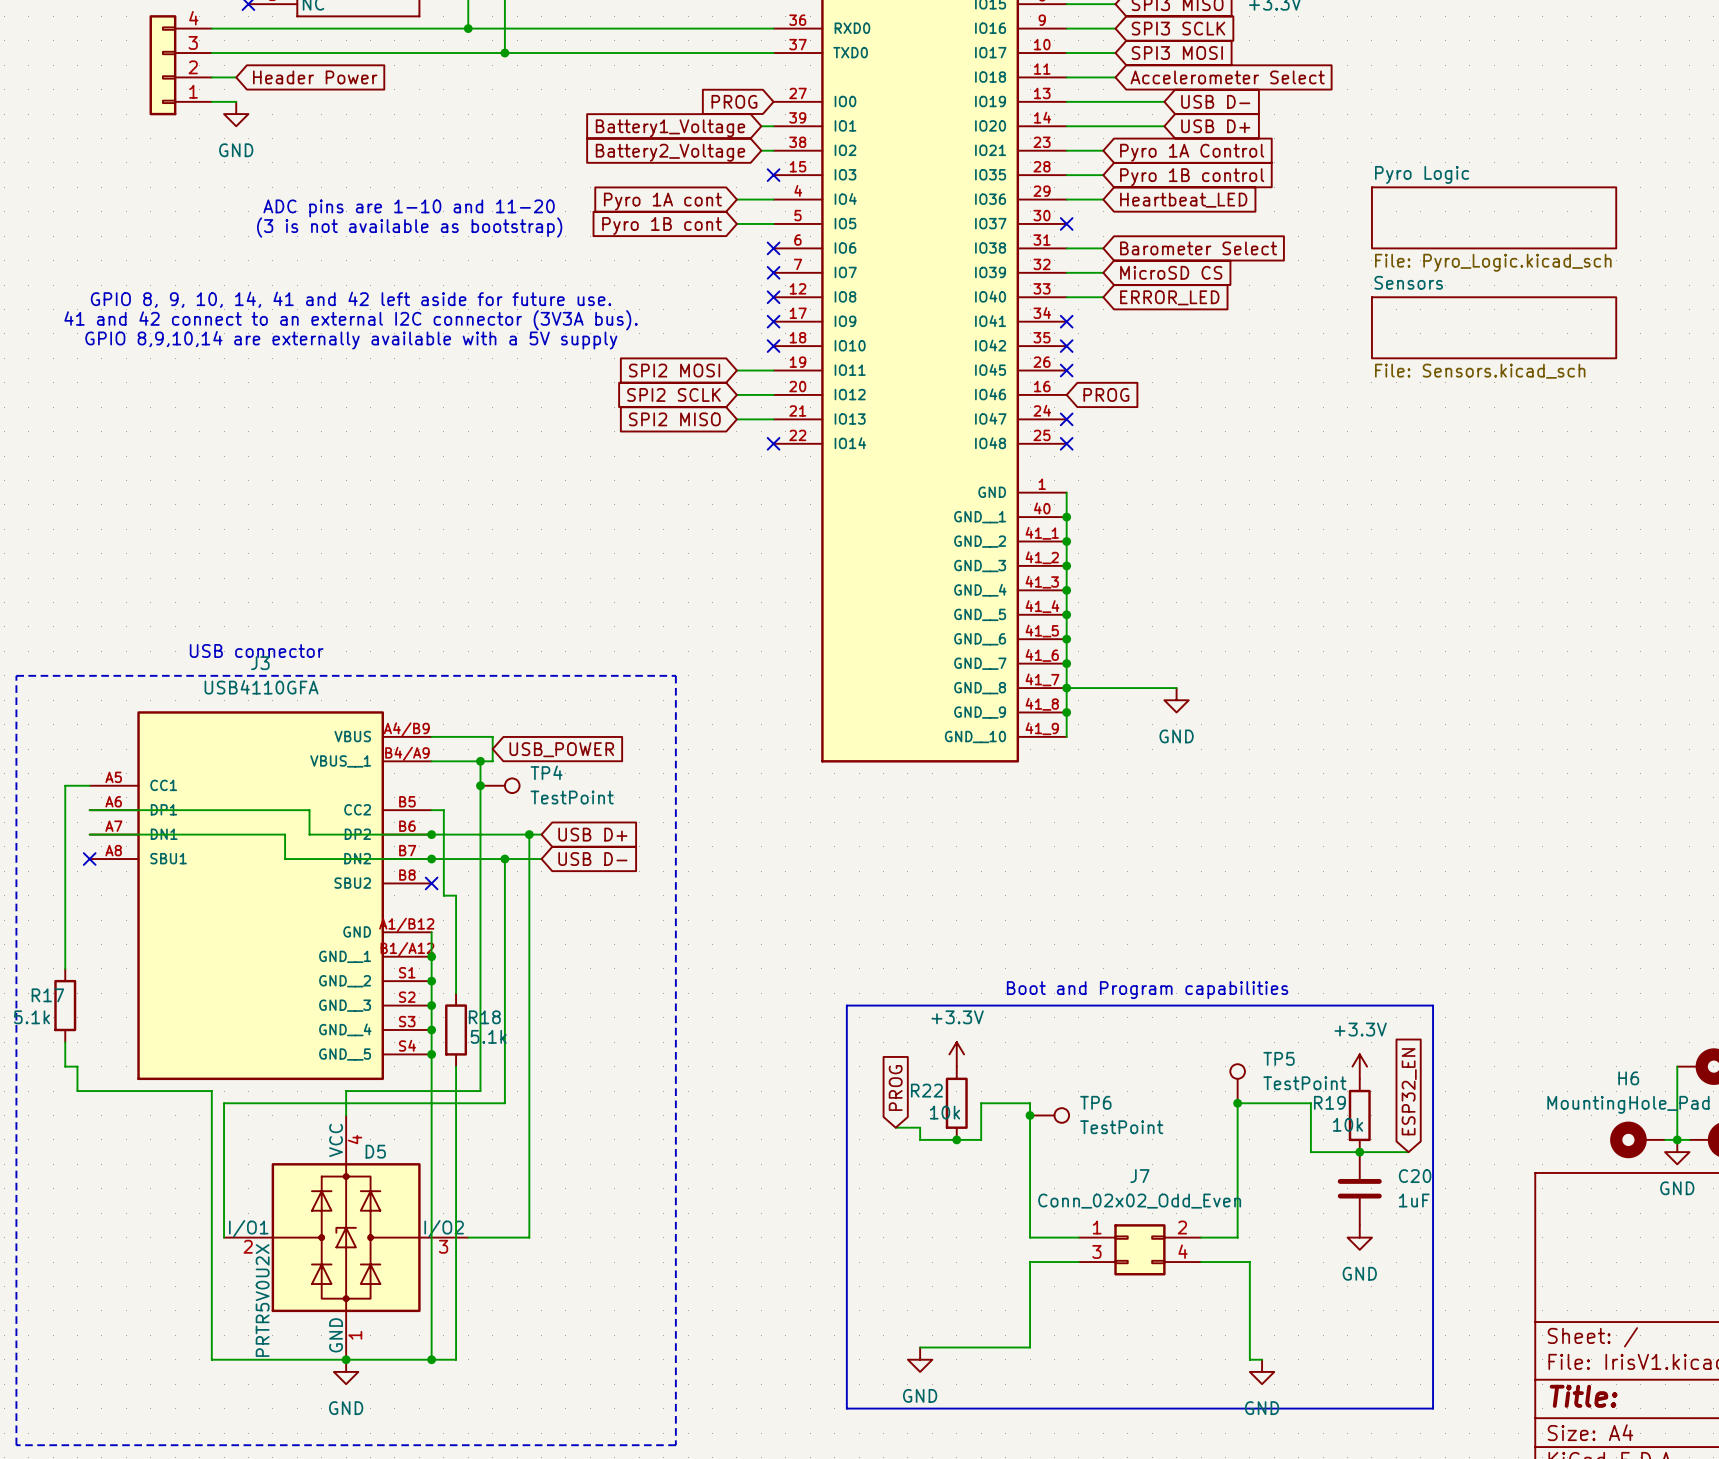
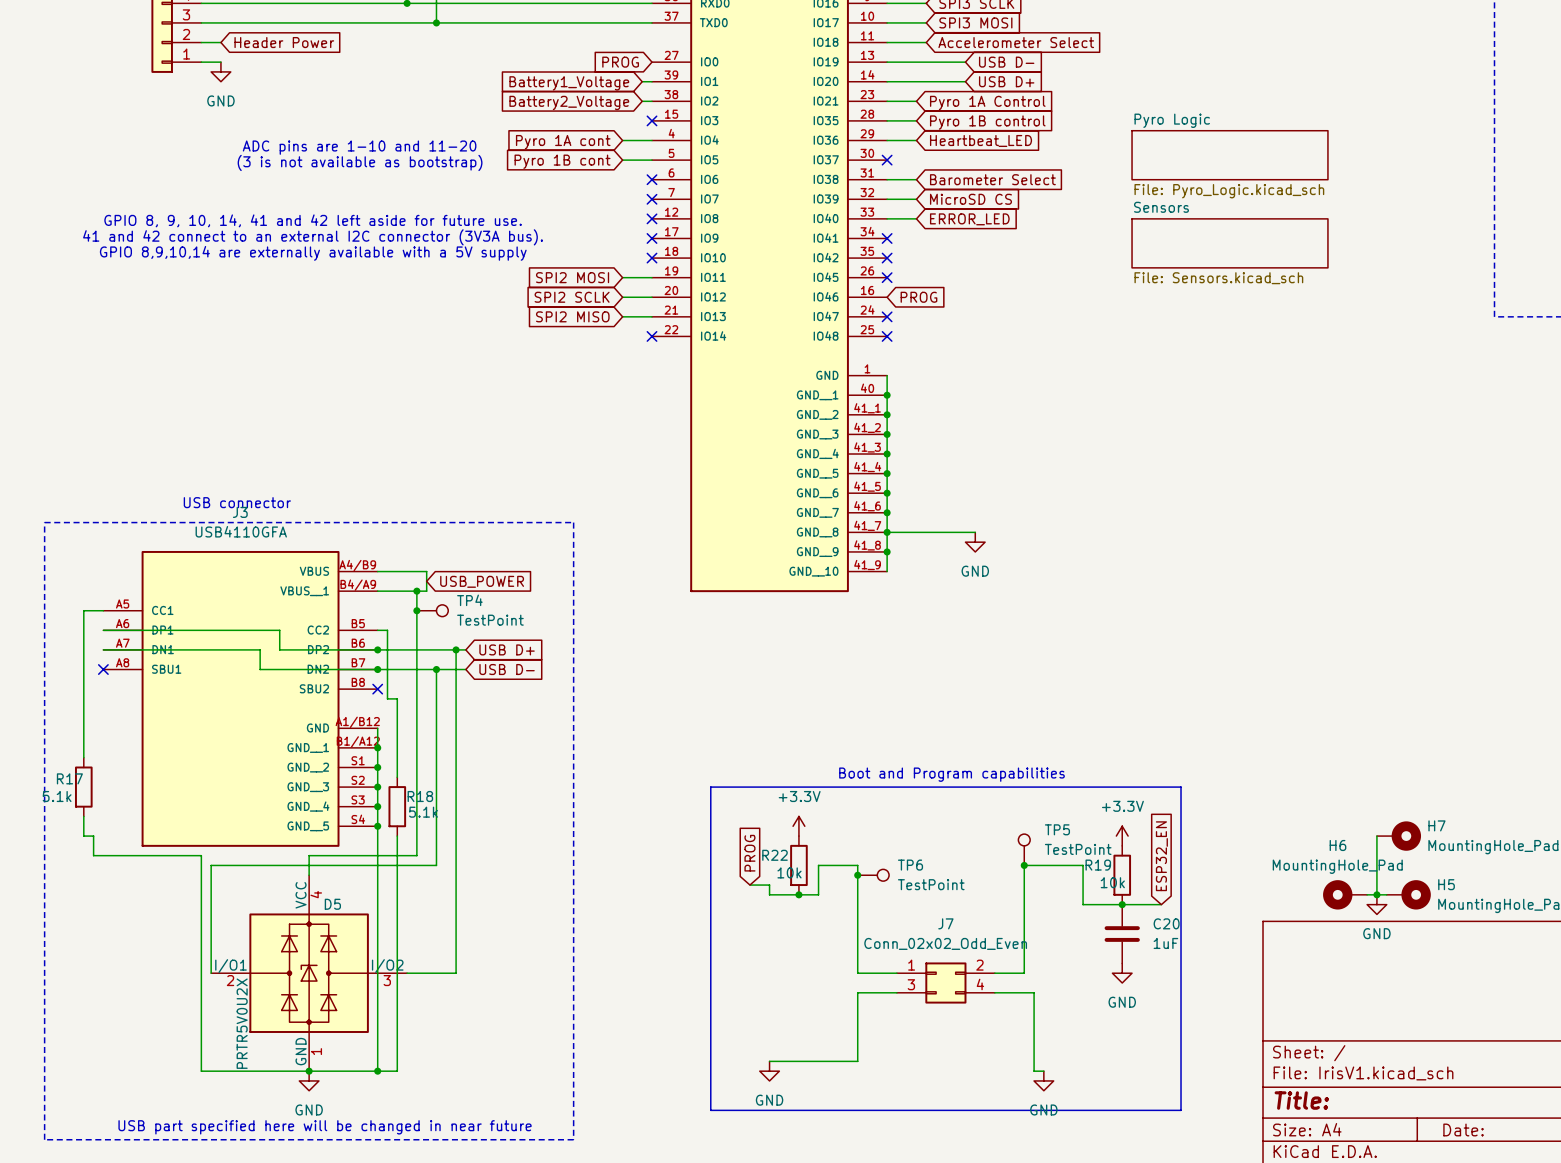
text: none -> USB part specified here will be changed in near future (325, 1127)

